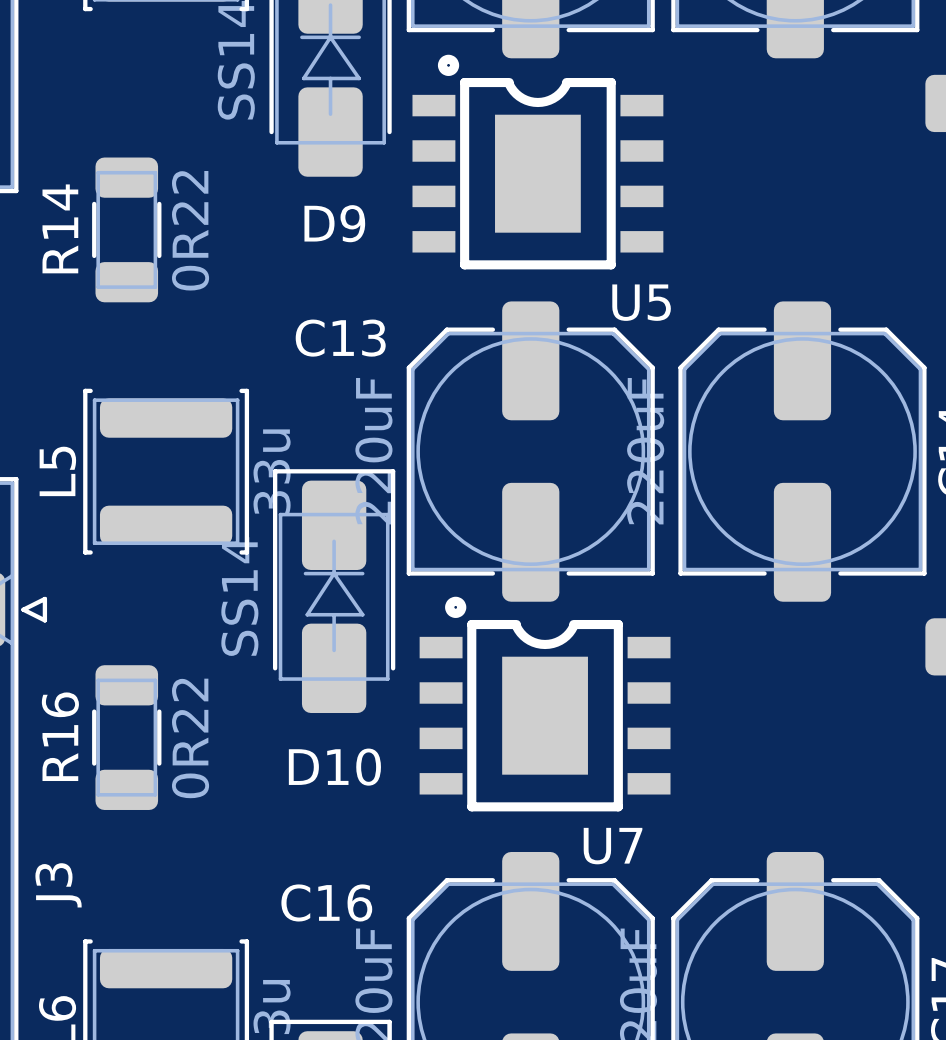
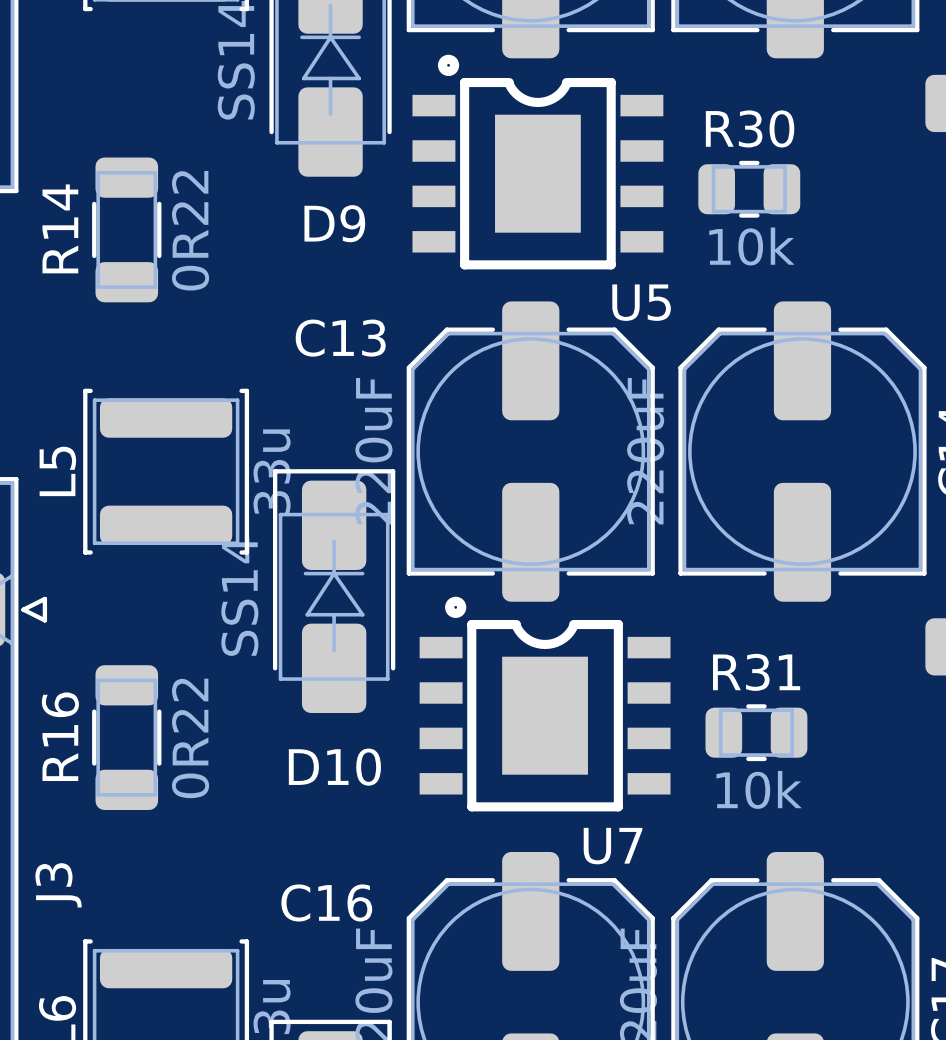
R30: none -> 10k (749, 189)
R31: none -> 10k (756, 732)

